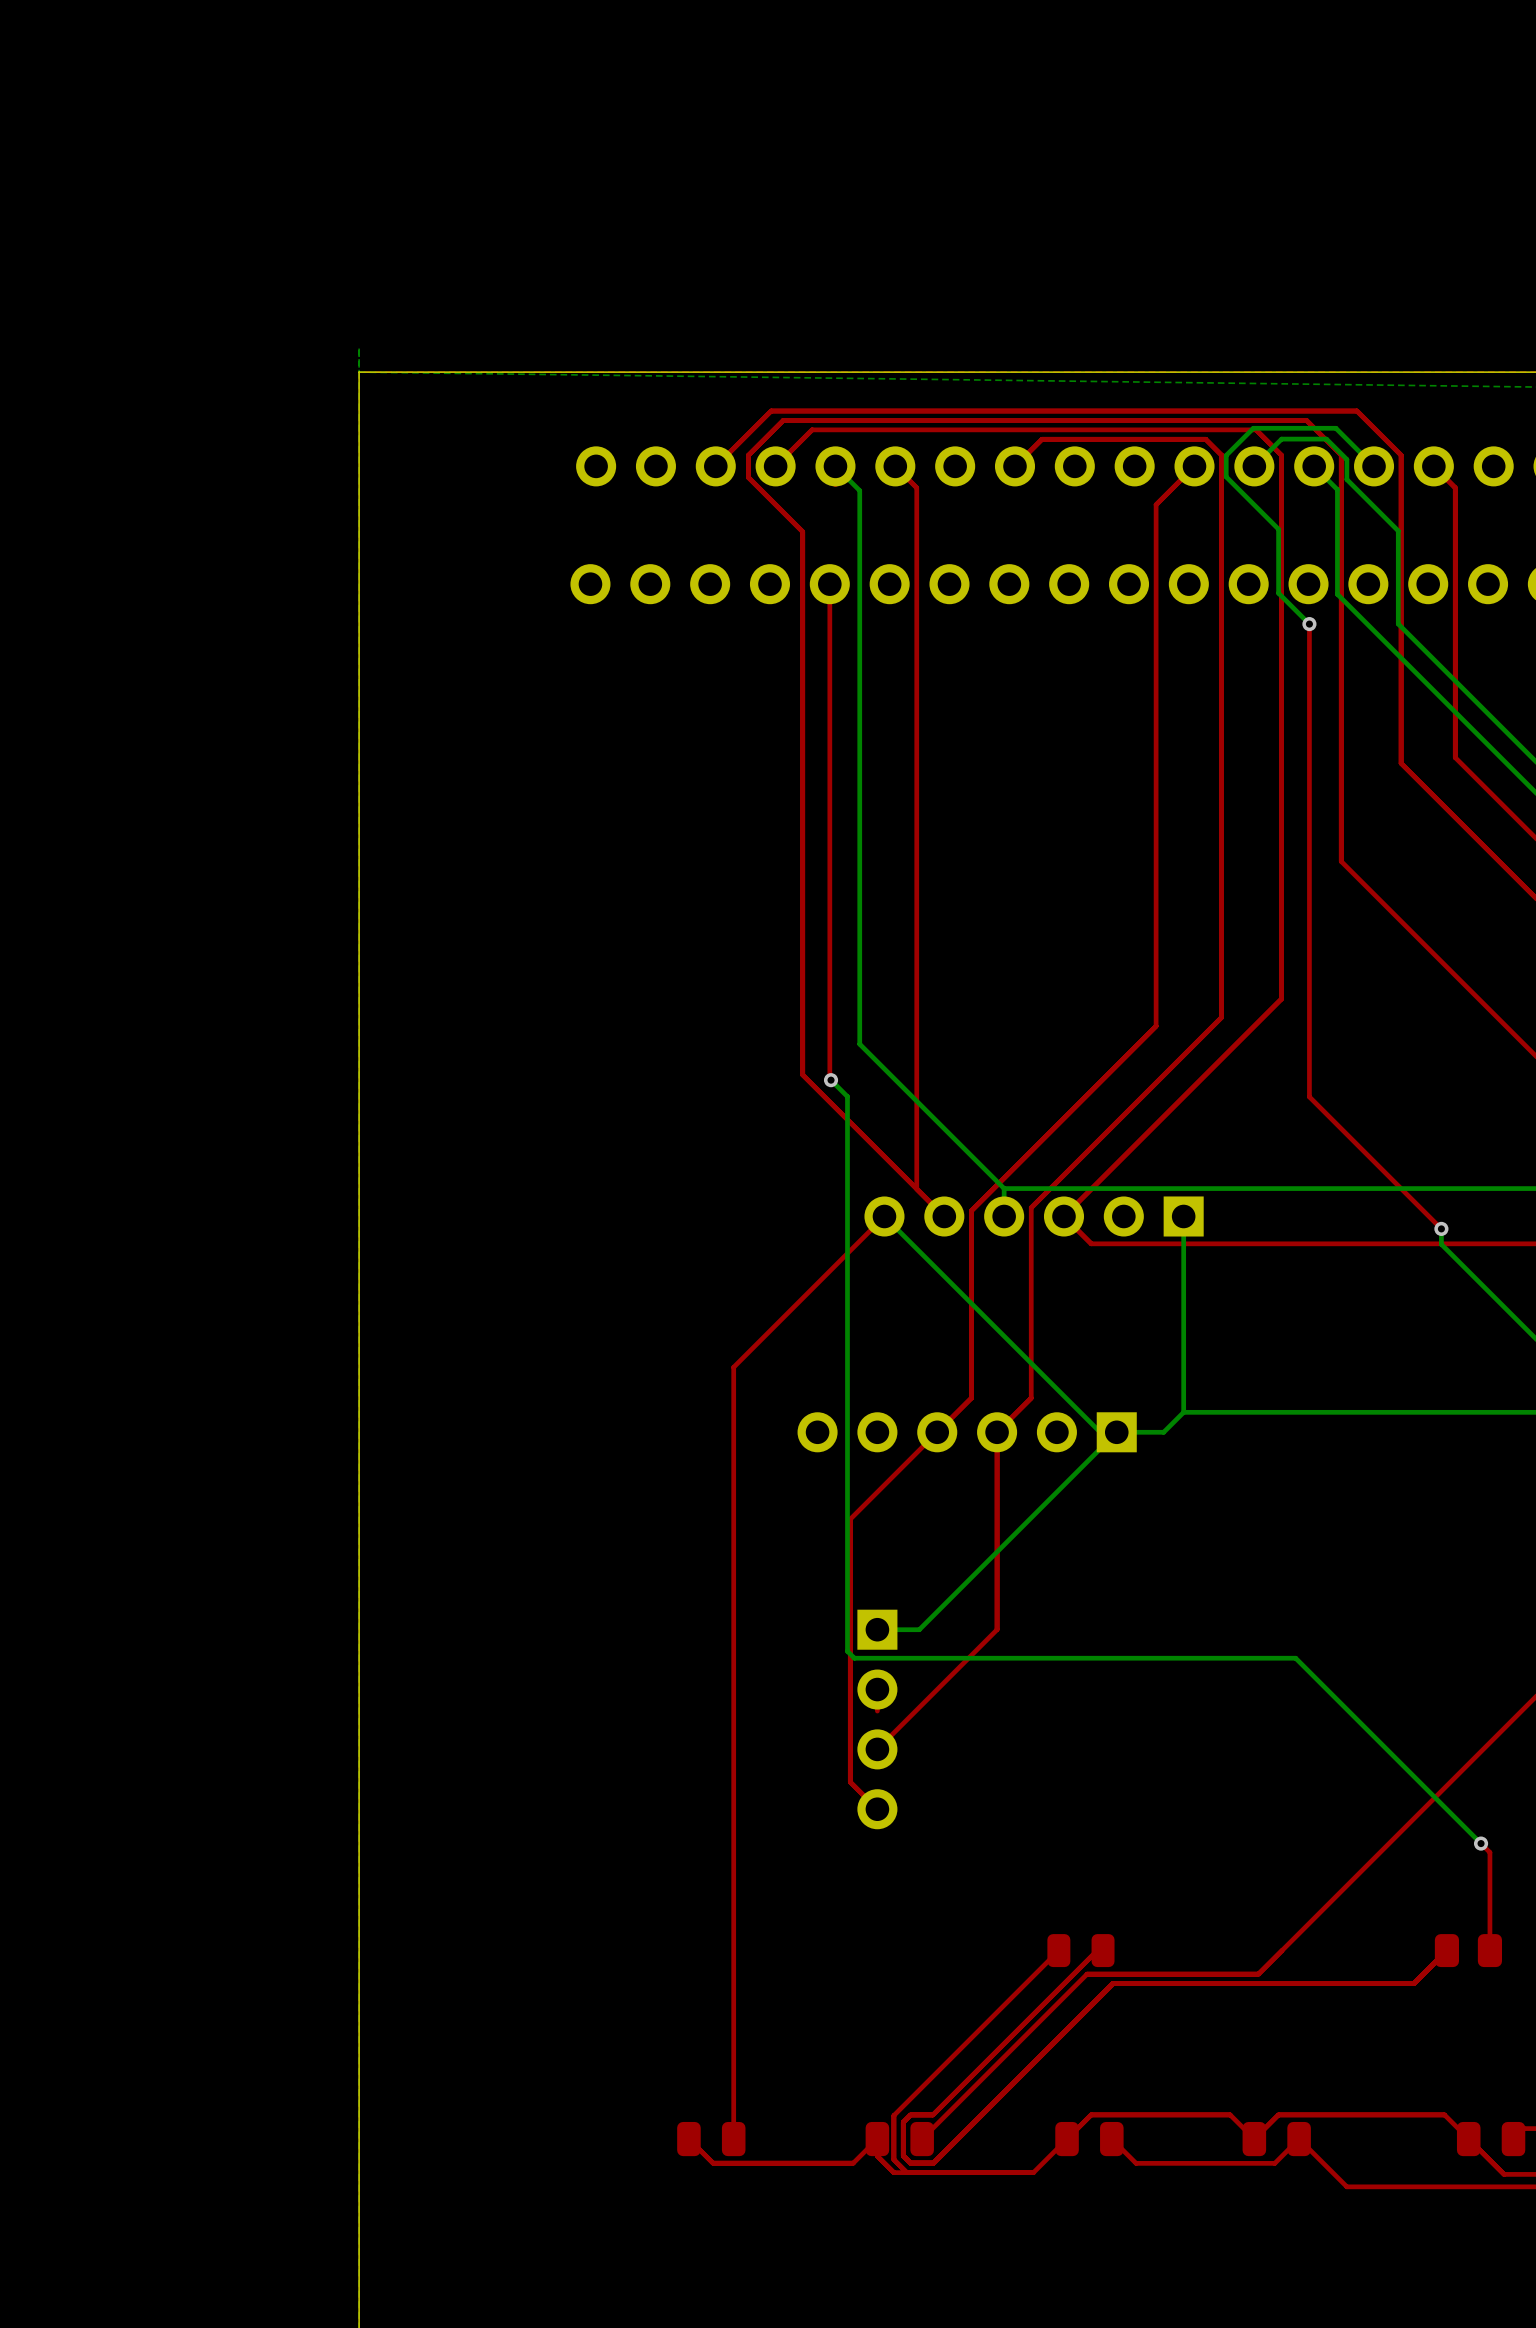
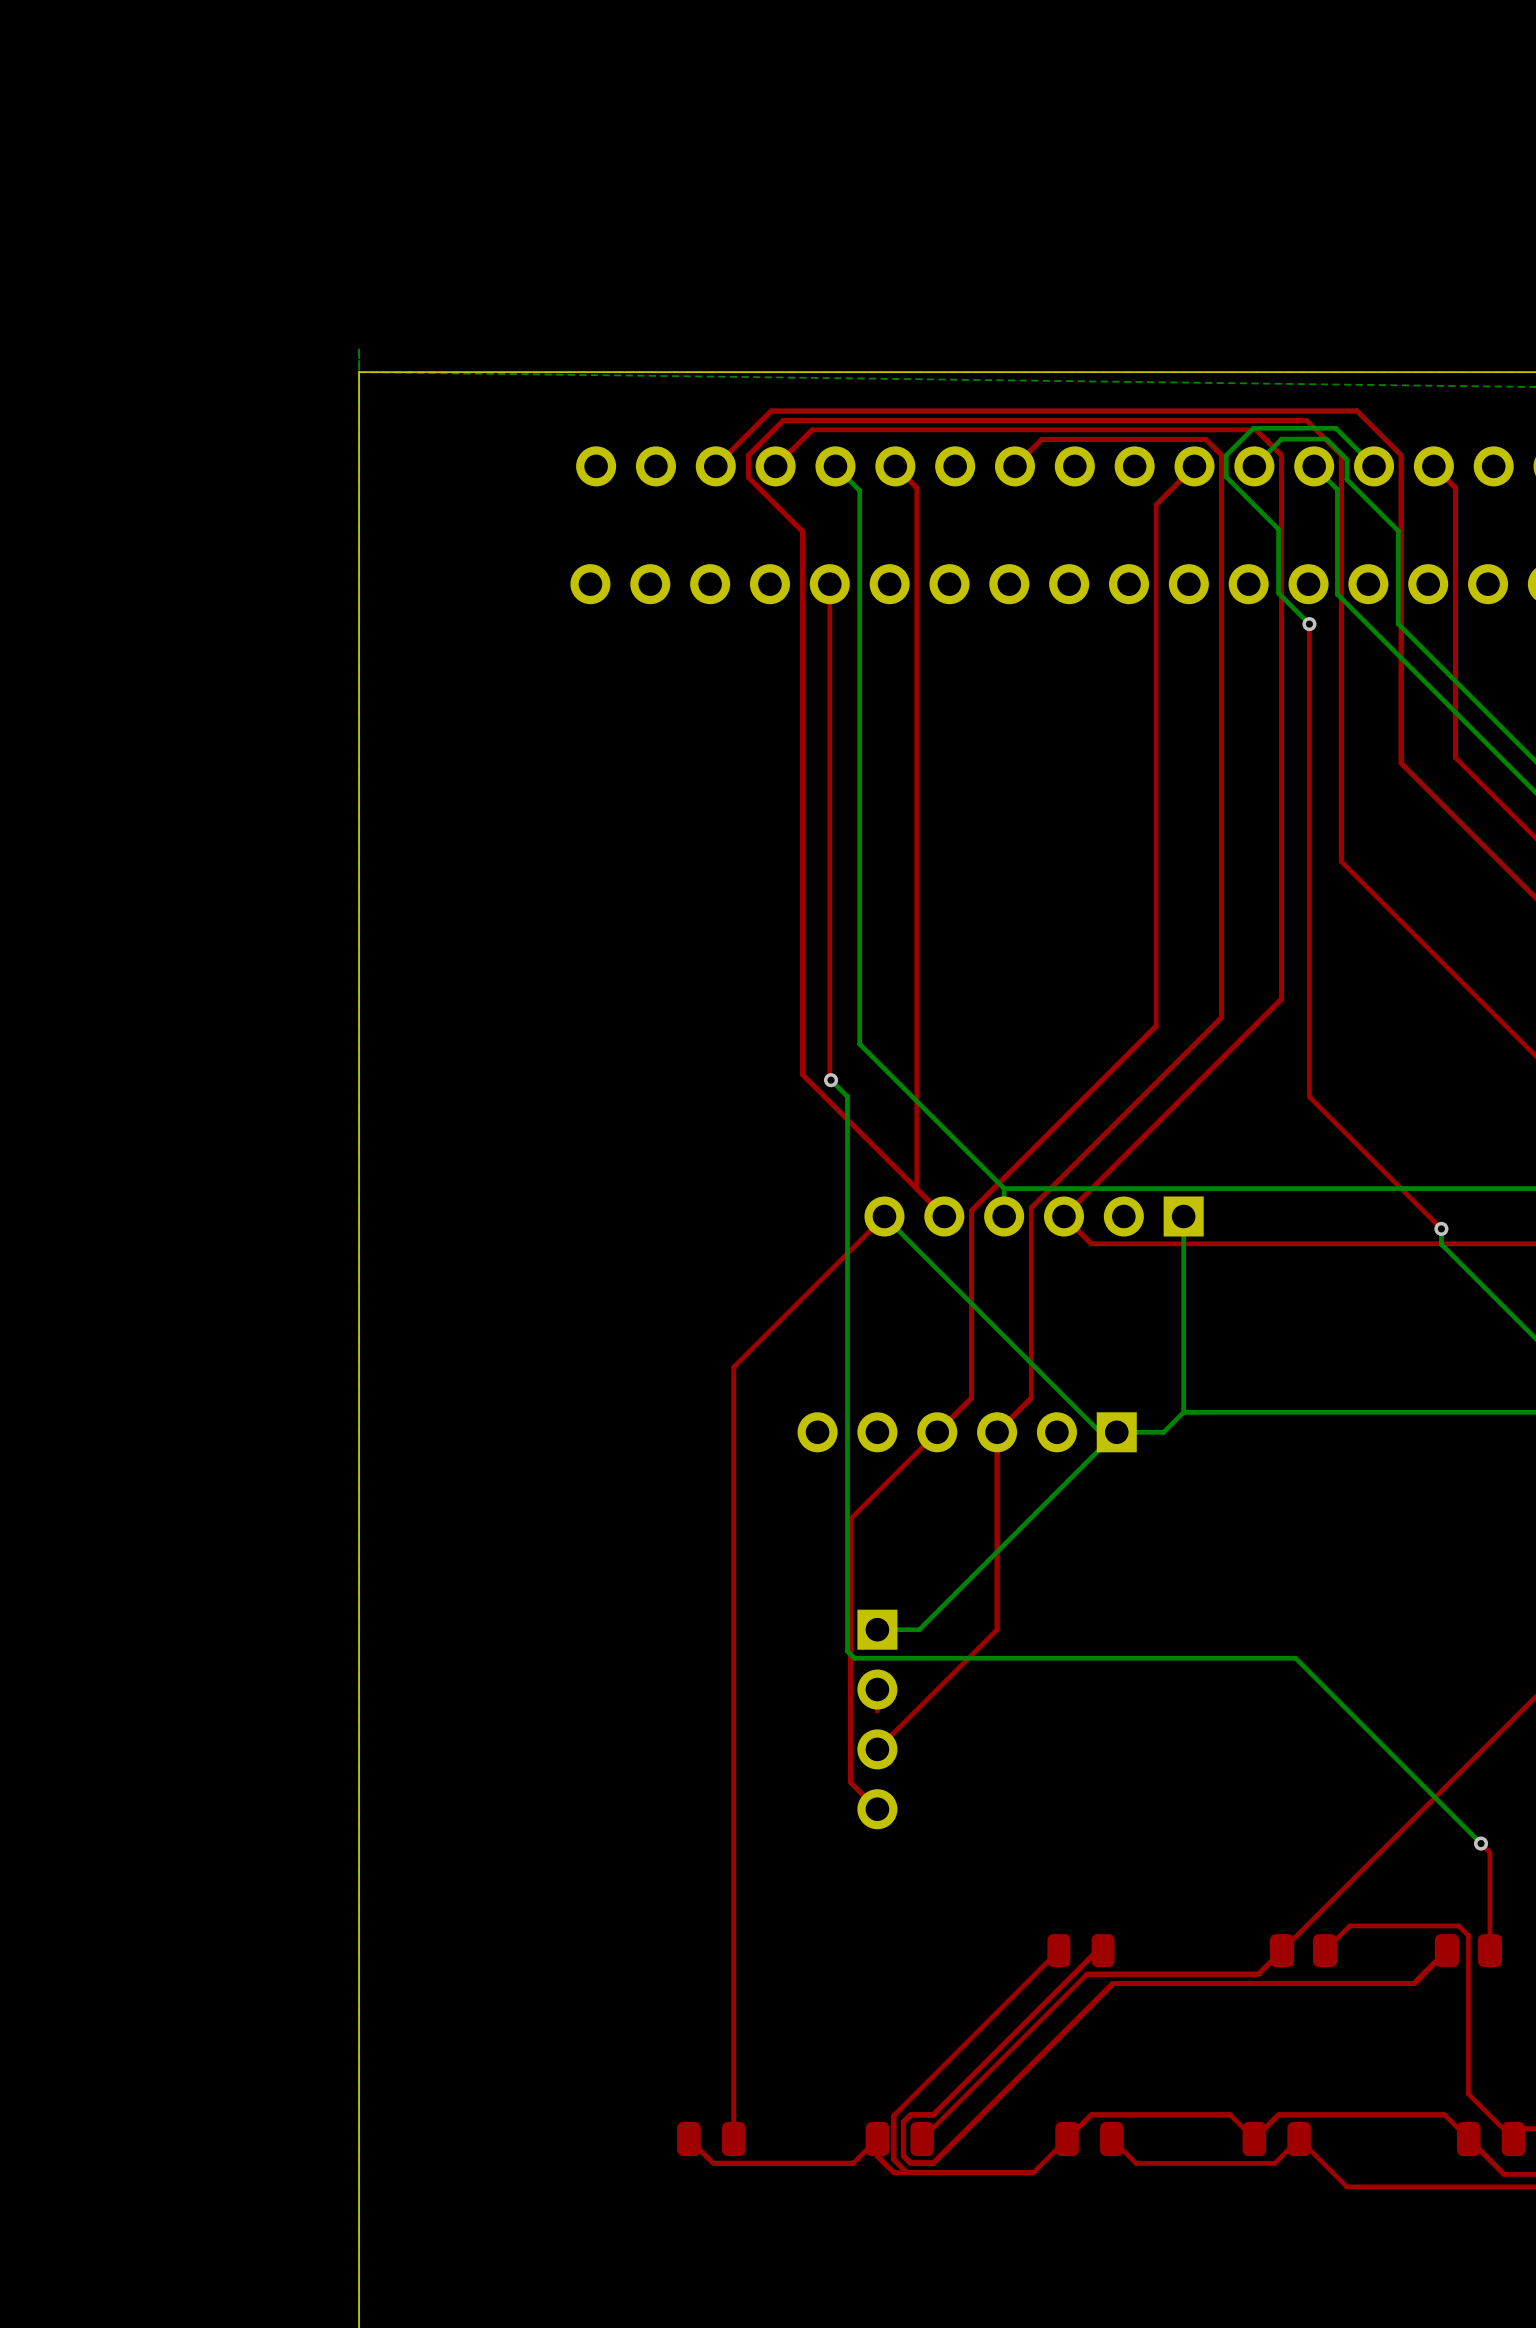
part: none -> (1303, 1950)
top track: none -> (1325, 1950) (1349, 1925) (1458, 1925) (1468, 1935) (1468, 2093) (1513, 2139)

